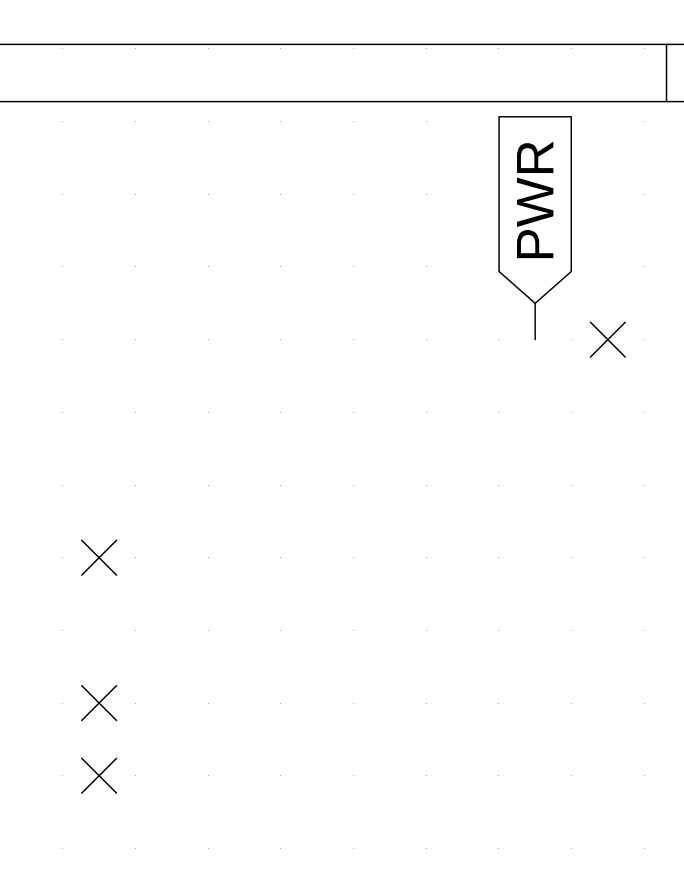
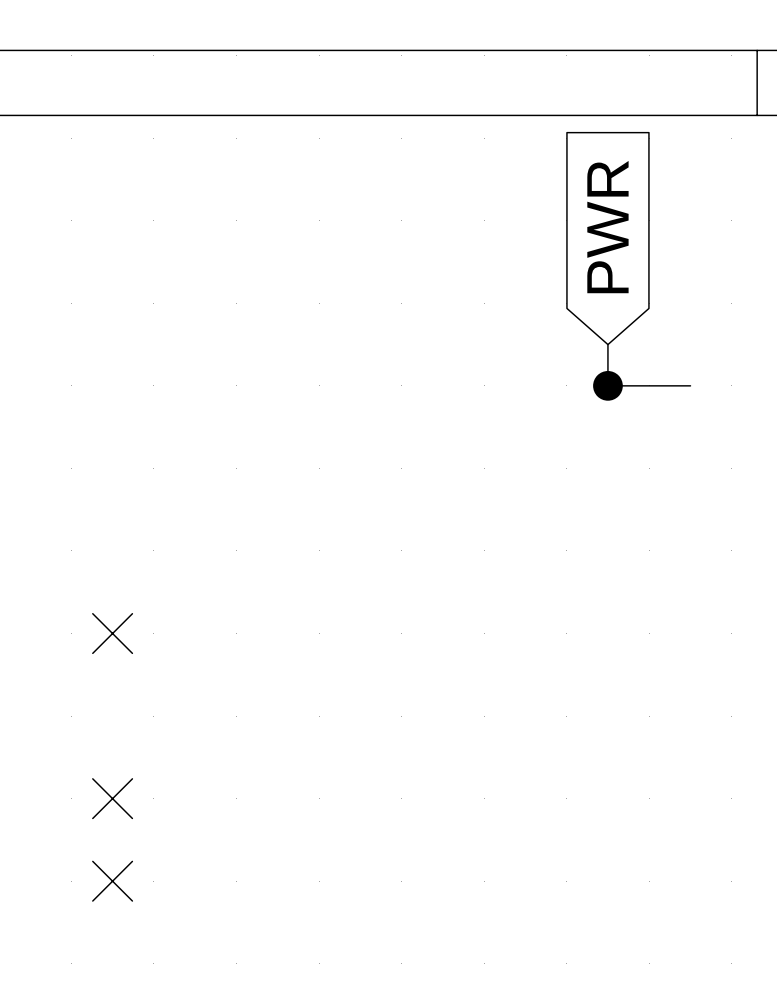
wire: none -> (607, 385) (690, 385)
junction: none -> (607, 385)
no-connect mark: (607, 339) -> none

